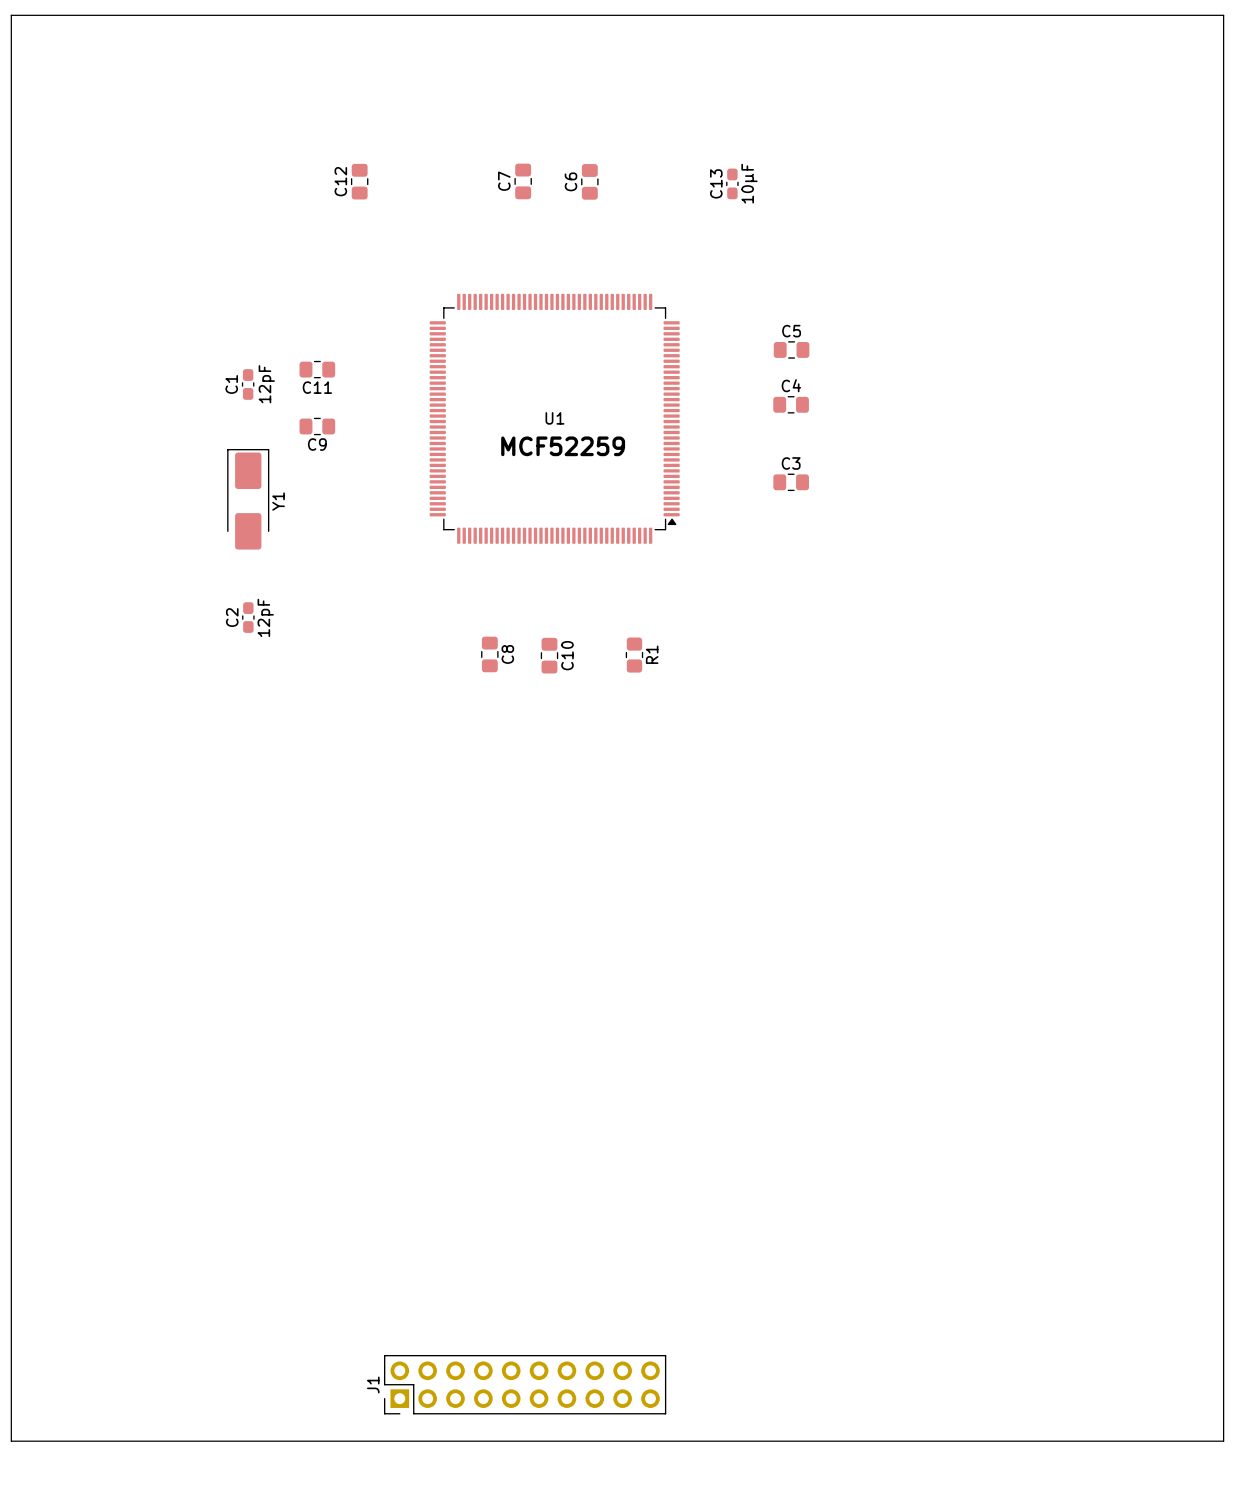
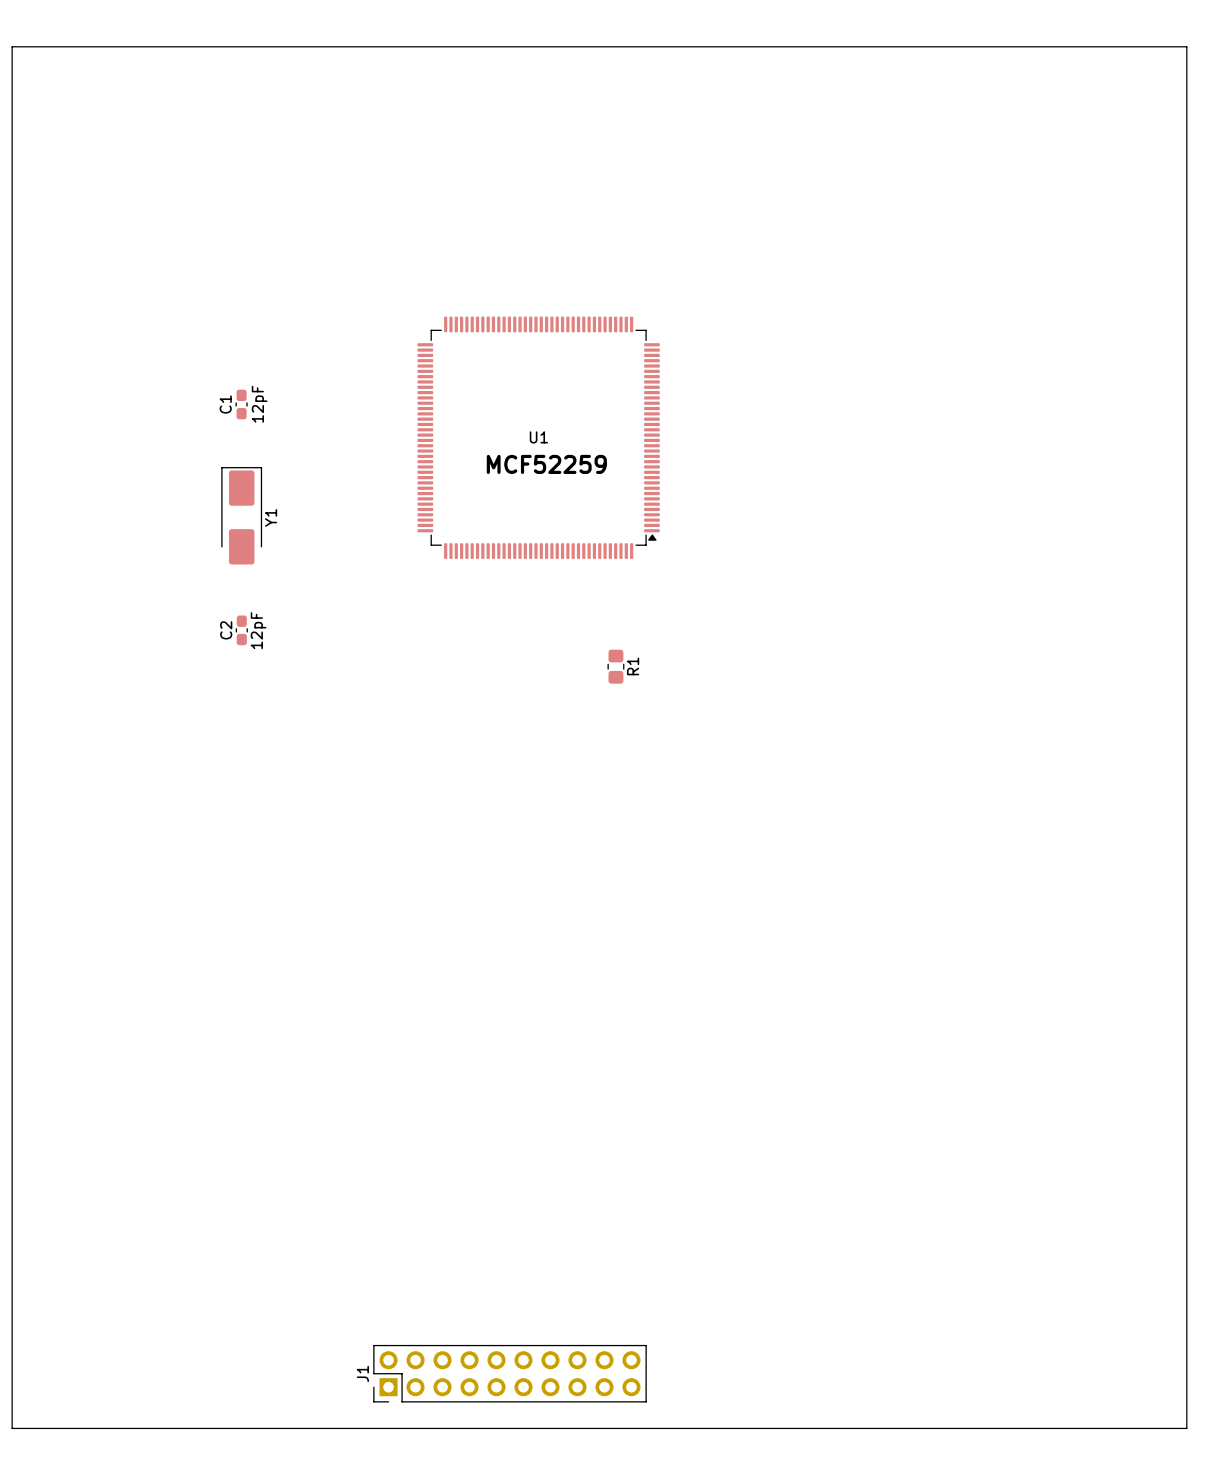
C12: (359, 181) -> none
C7: (523, 181) -> none
C6: (589, 181) -> none
C13: 10µF (732, 183) -> none
C5: (791, 349) -> none
C11: (317, 369) -> none
C4: (791, 404) -> none
C9: (317, 426) -> none
C3: (791, 482) -> none
C8: (489, 654) -> none
C10: (549, 655) -> none

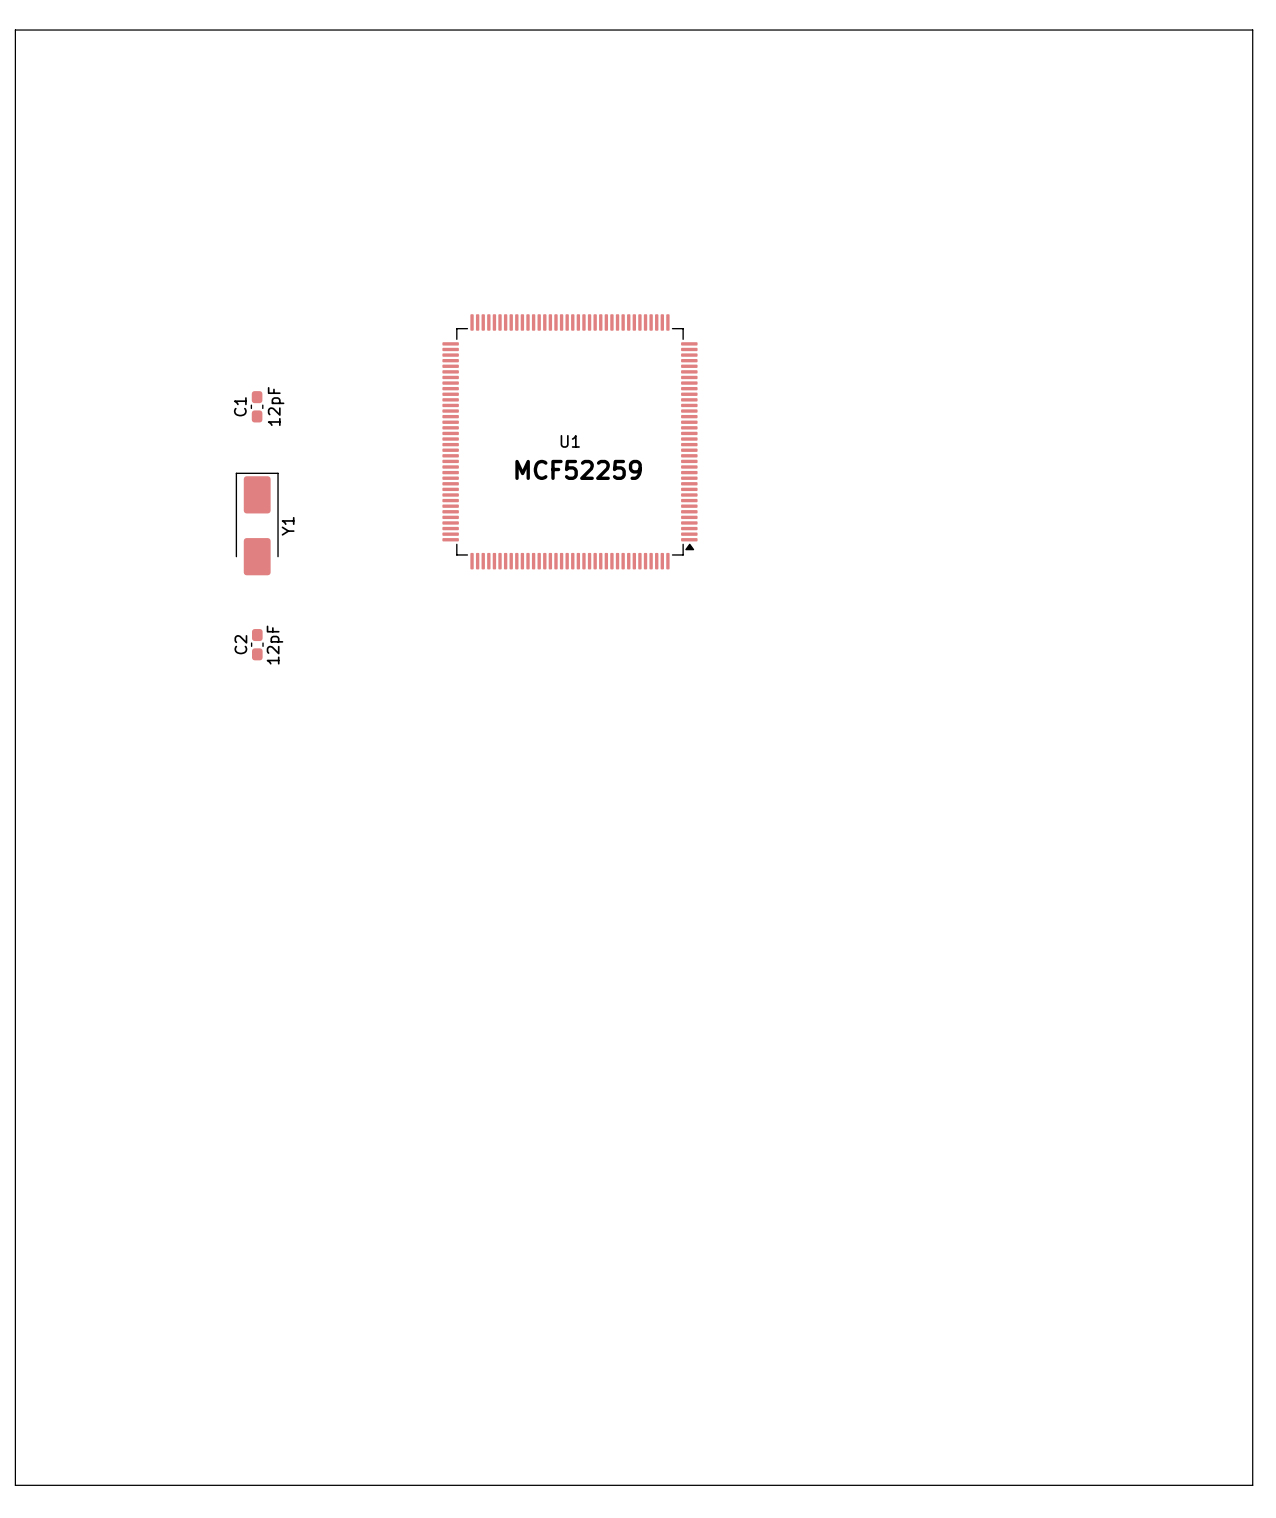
R1: (615, 666) -> none
J1: (510, 1373) -> none

